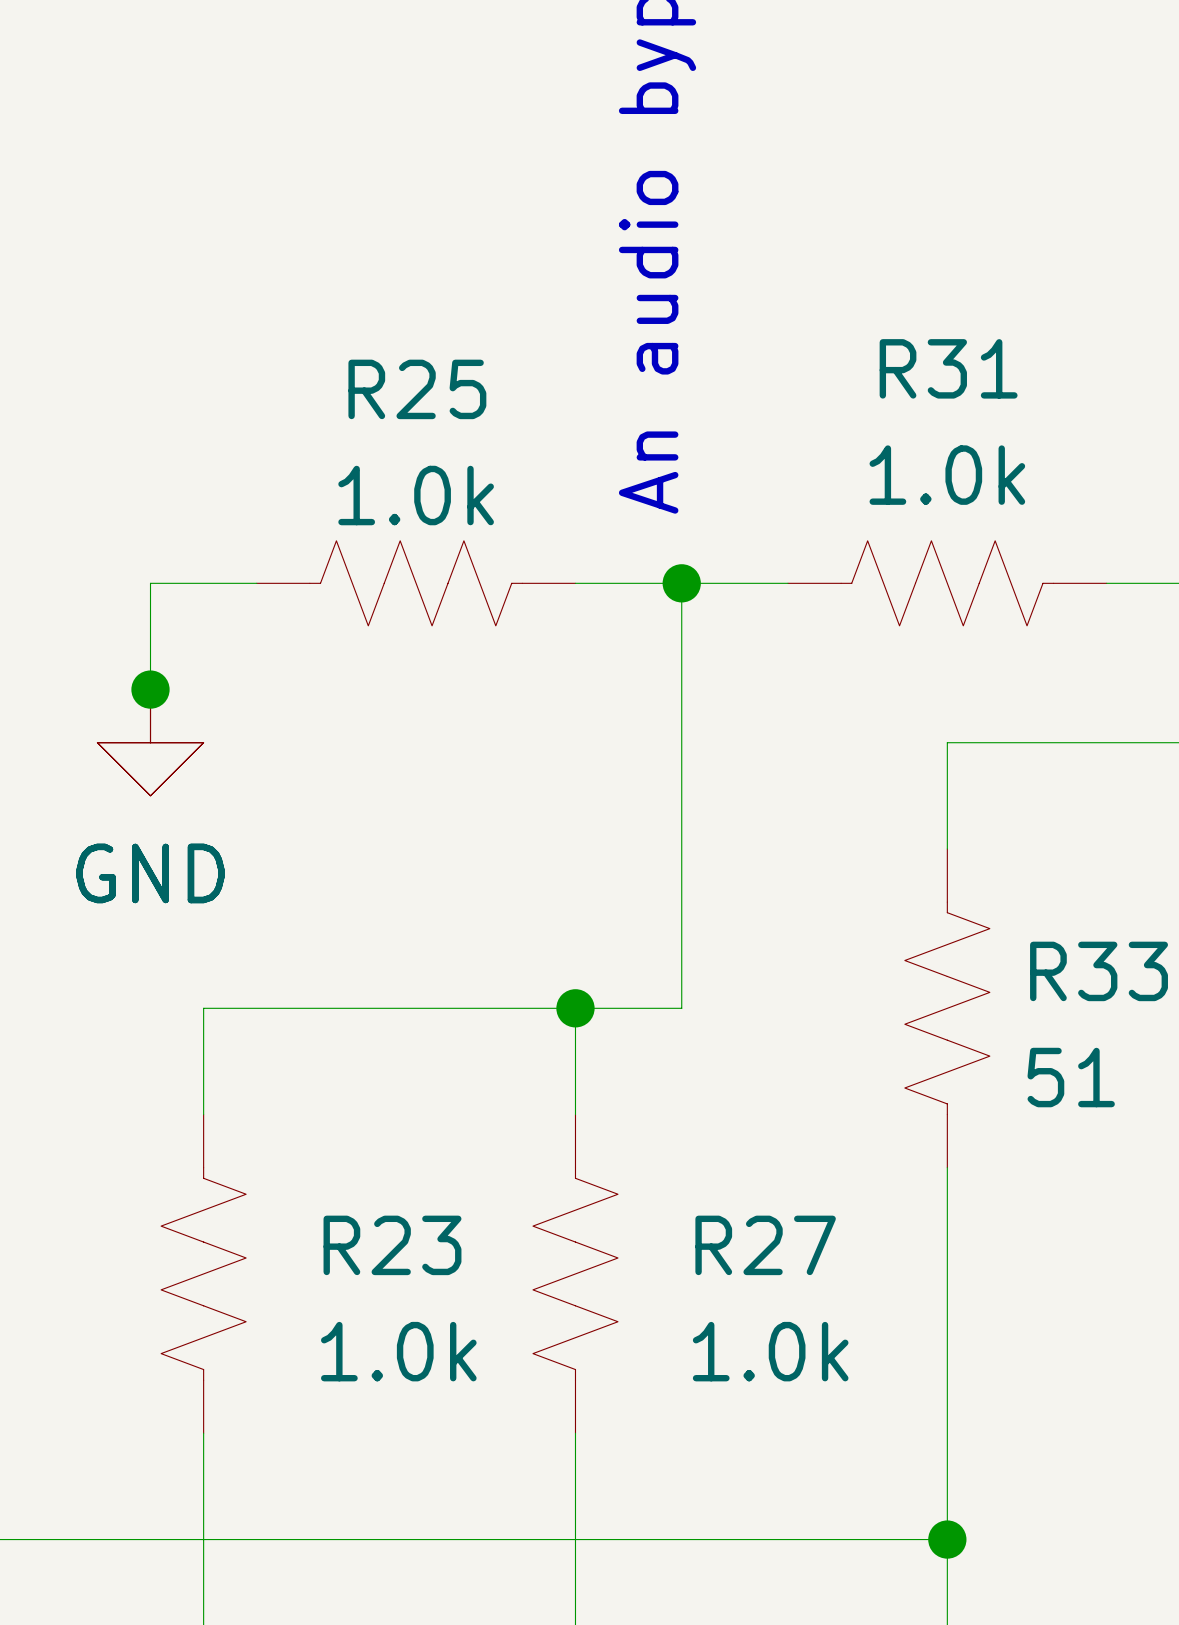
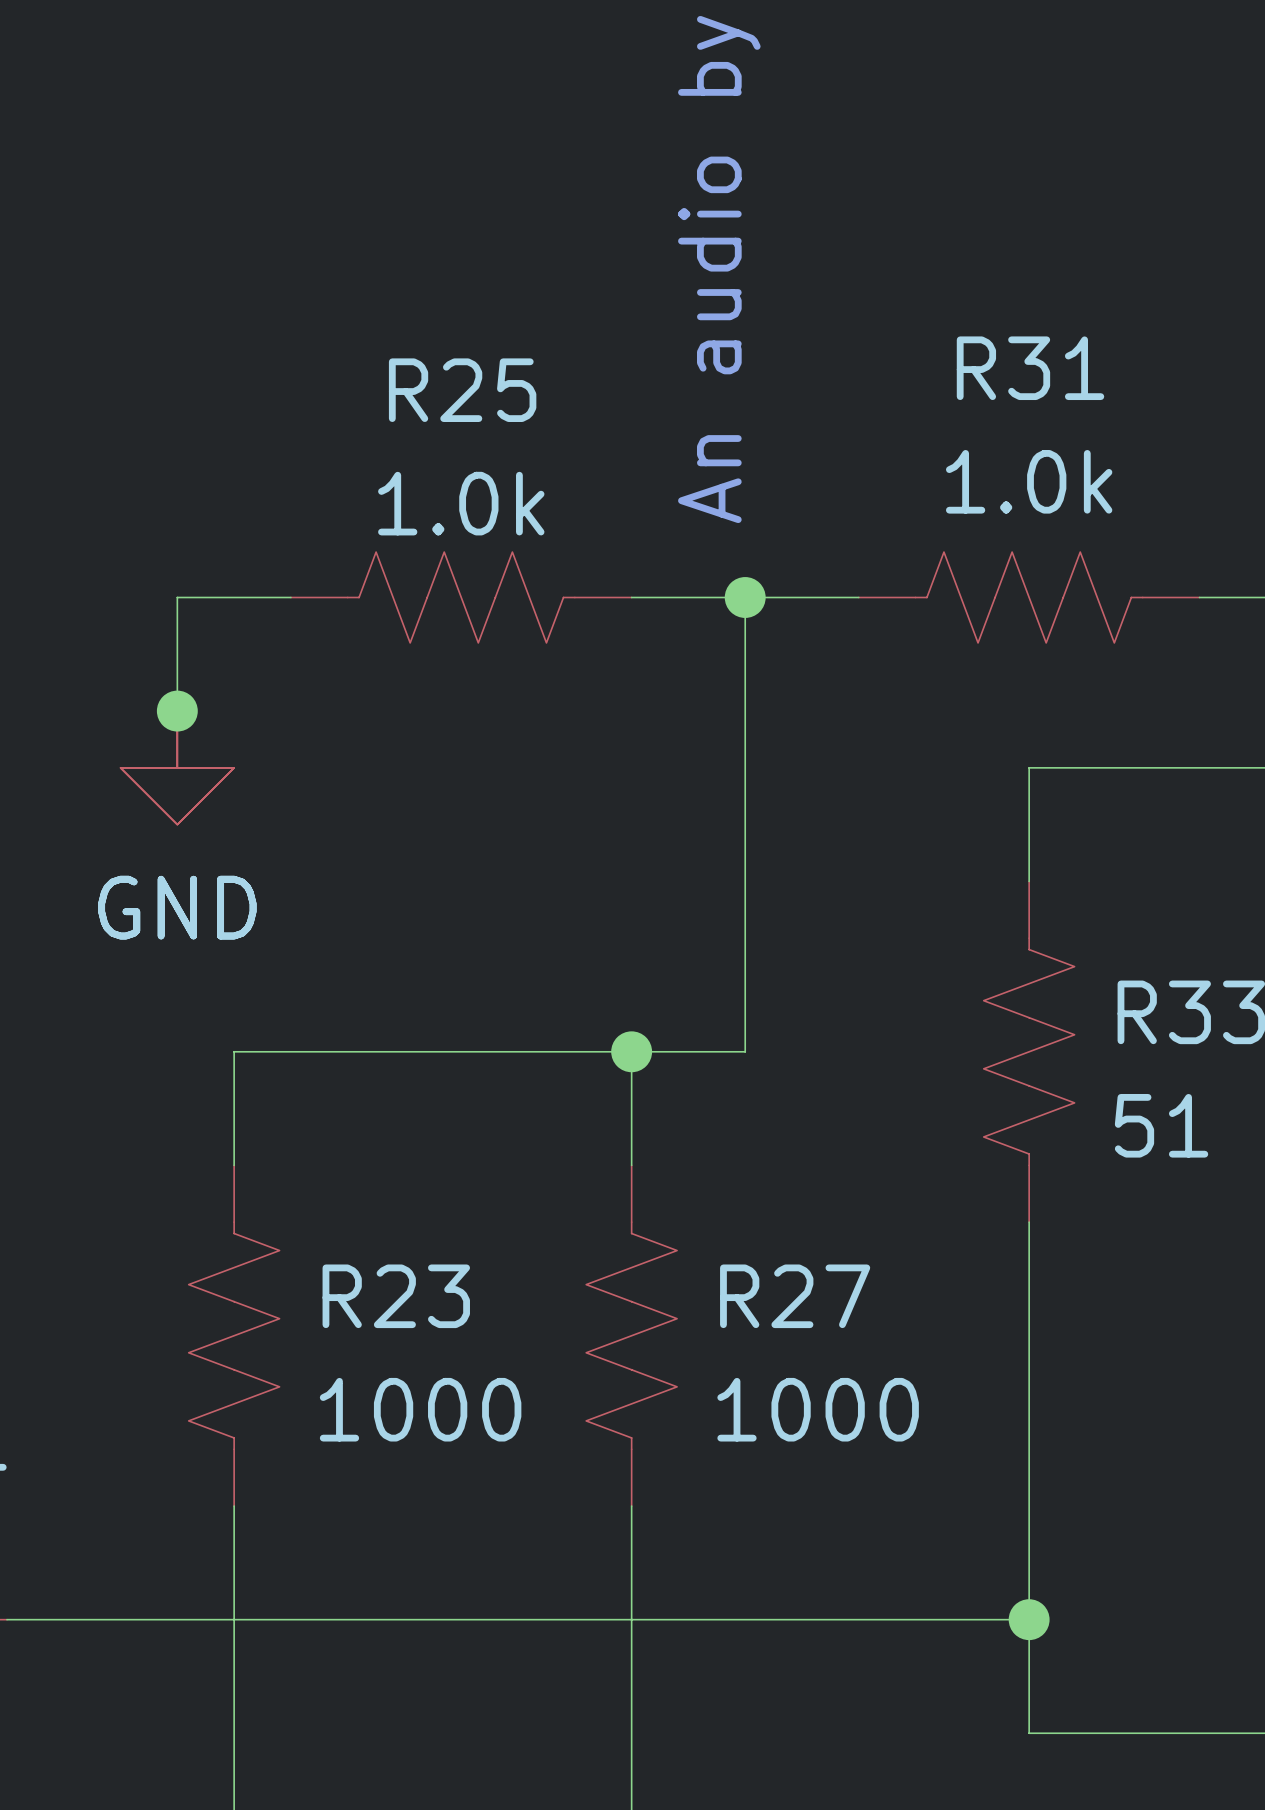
R23 name position: R23 (392, 1245) -> R23 (396, 1296)
R27 name position: R27 (765, 1245) -> R27 (795, 1296)
R23 value: 1.0k (398, 1351) -> 1000 (420, 1409)
R27 value: 1.0k (770, 1351) -> 1000 (818, 1409)

